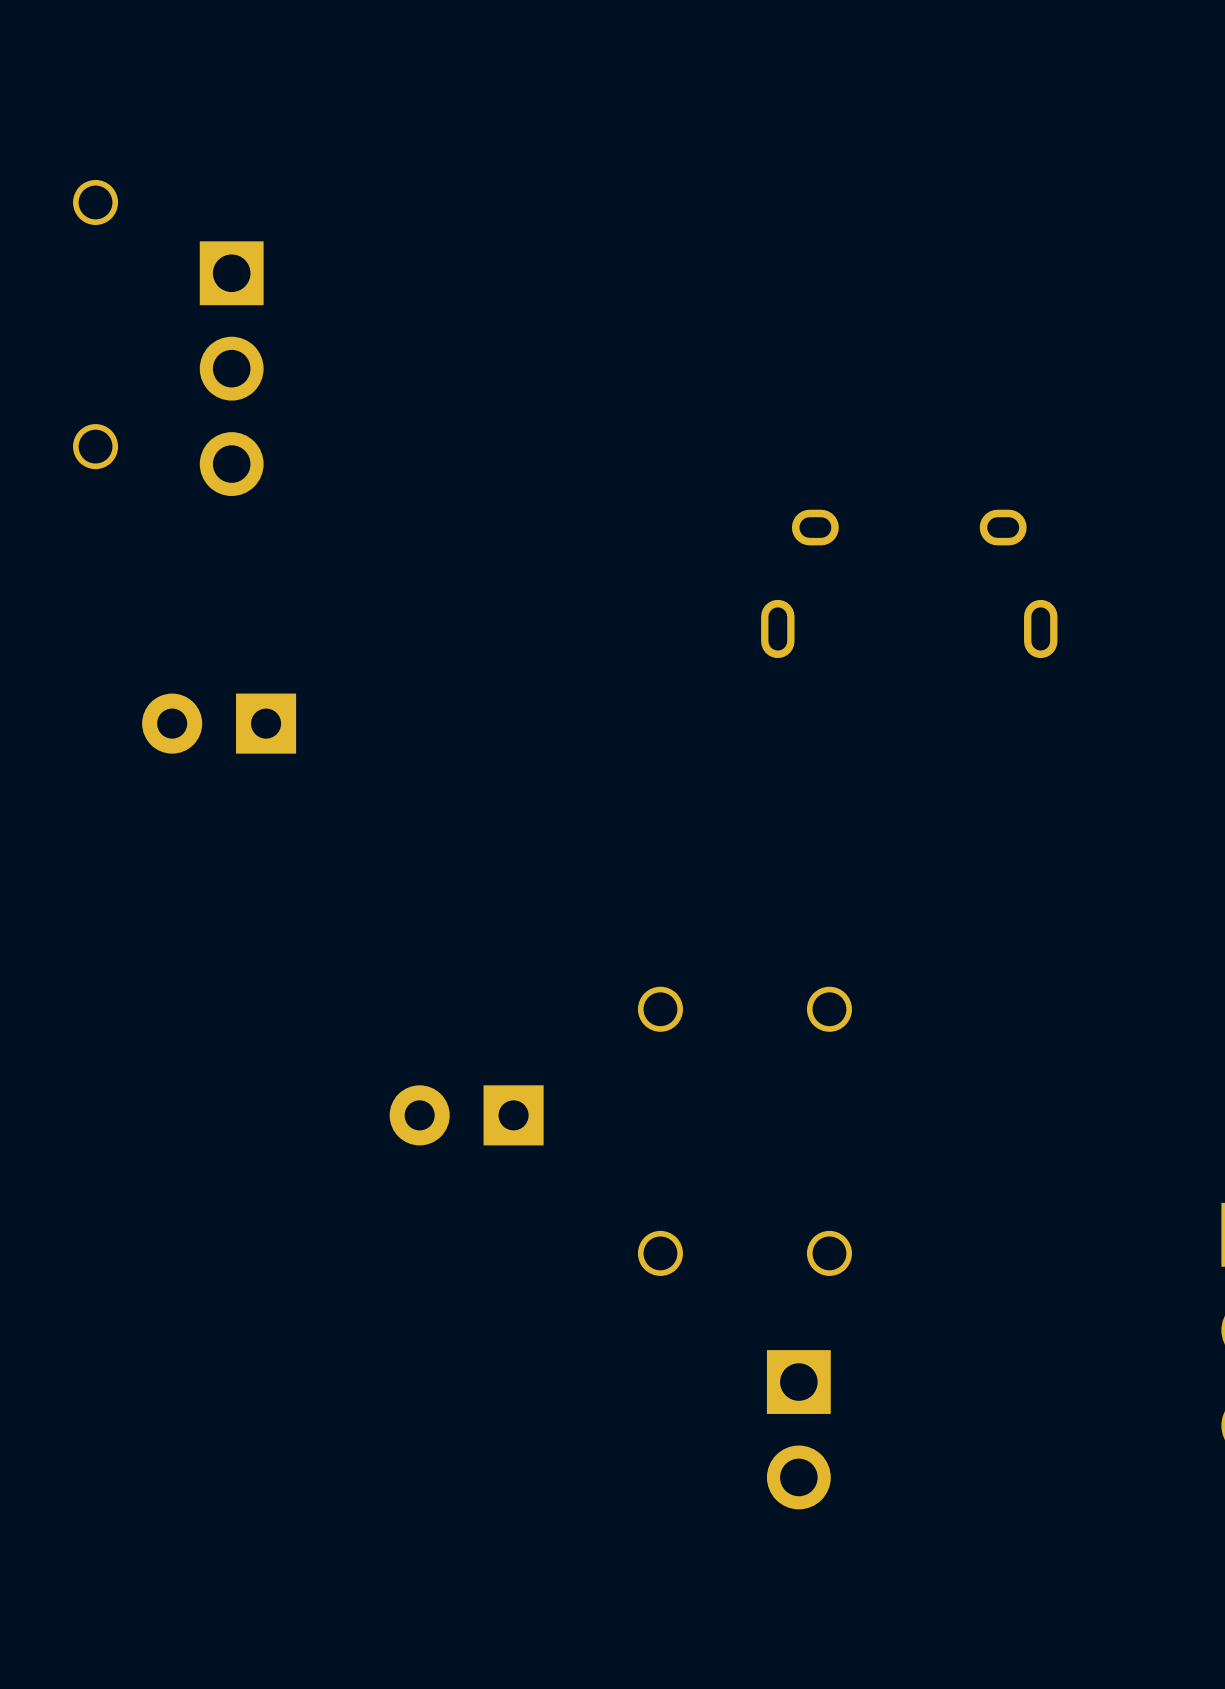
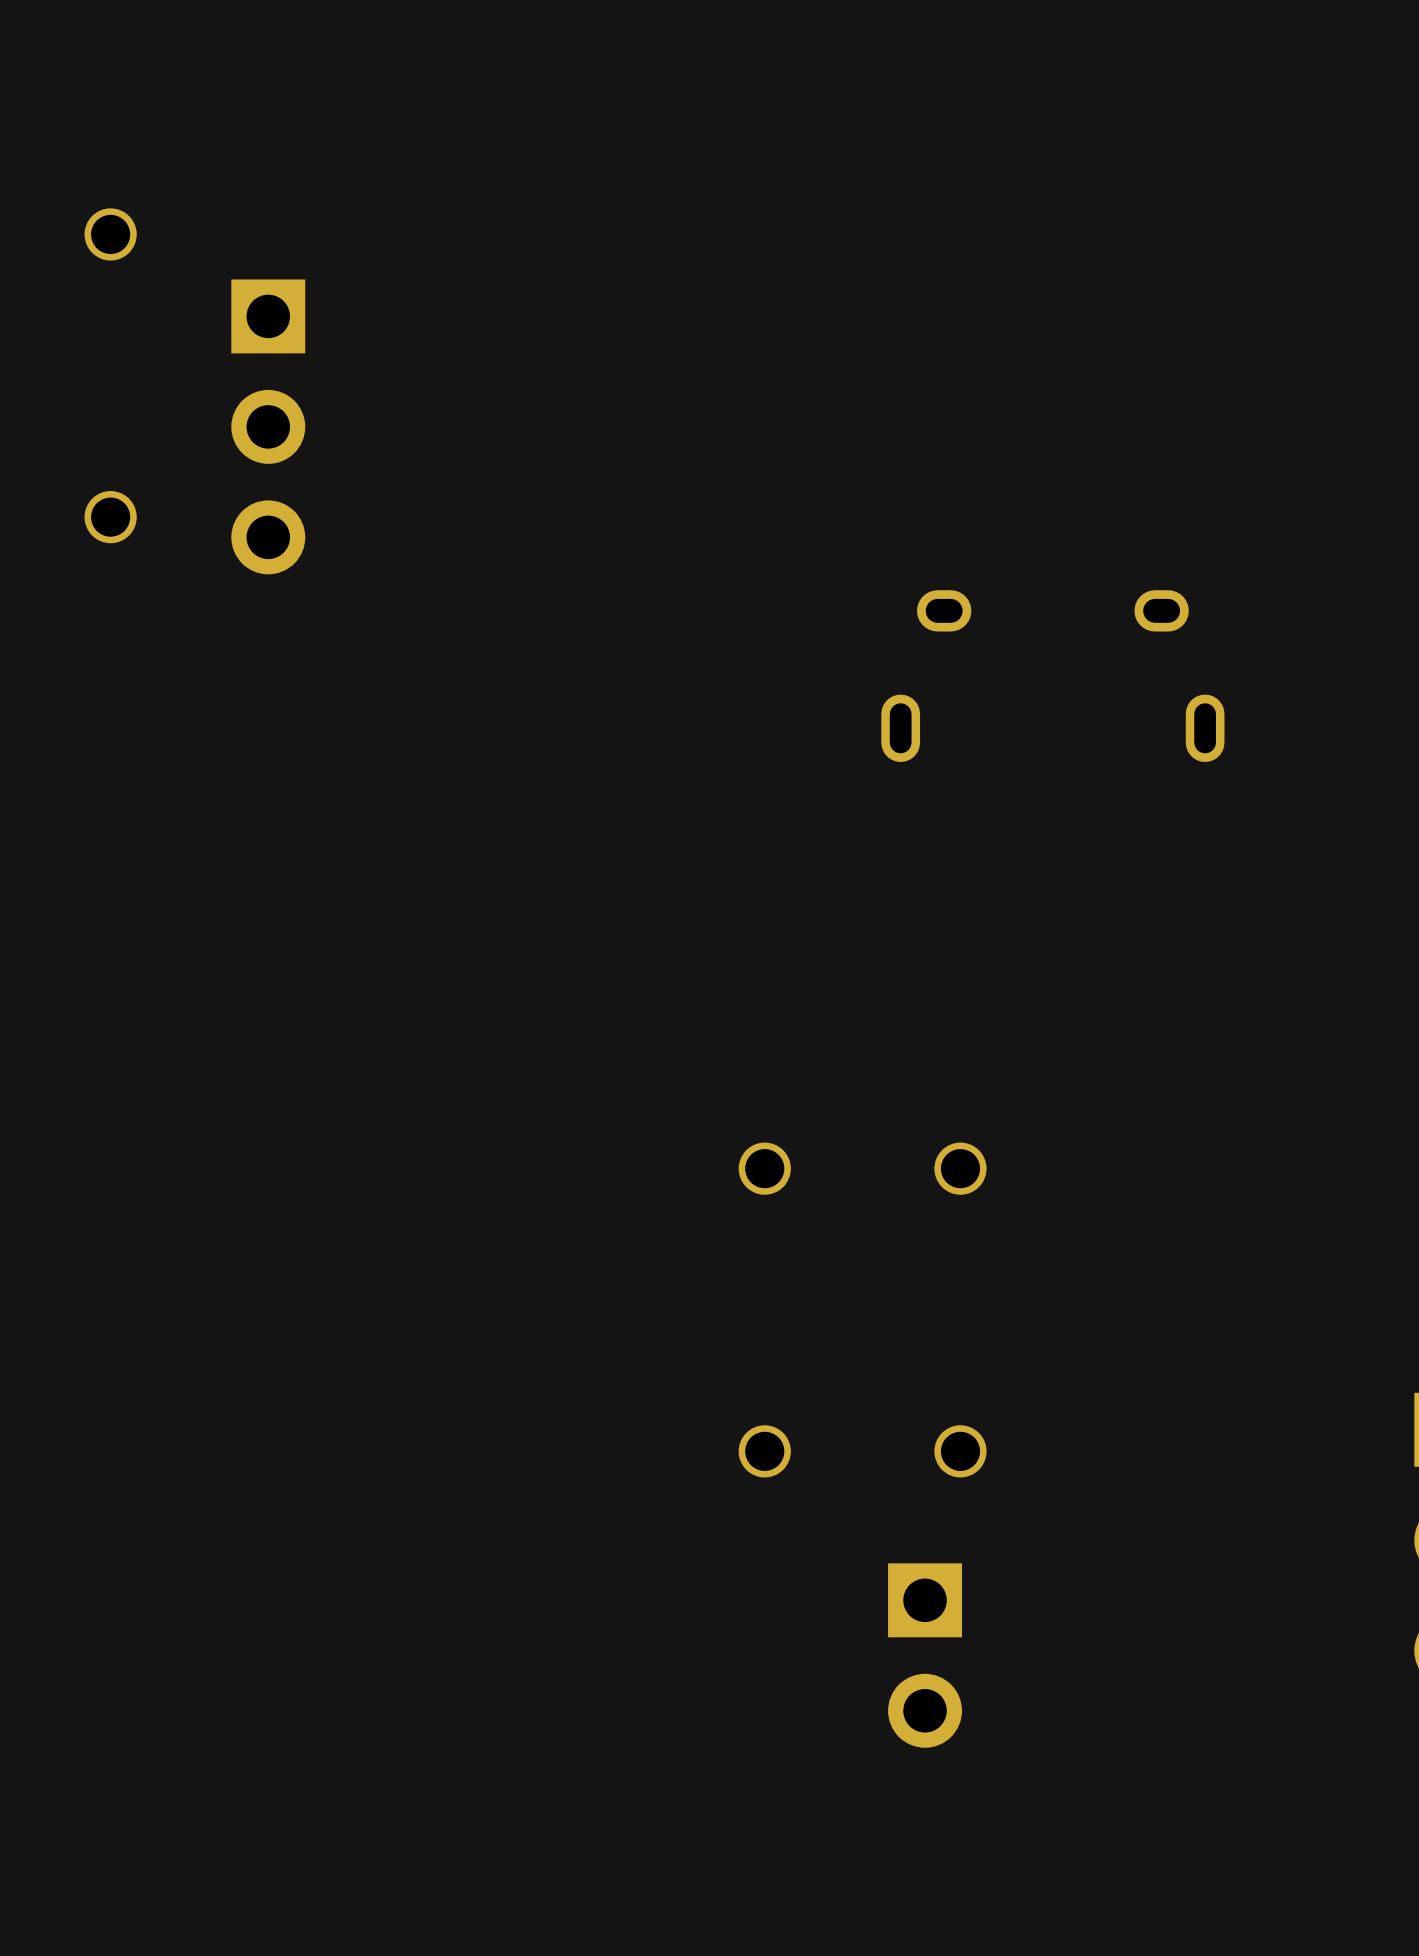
part: (219, 723) -> none
part: (466, 1115) -> none

